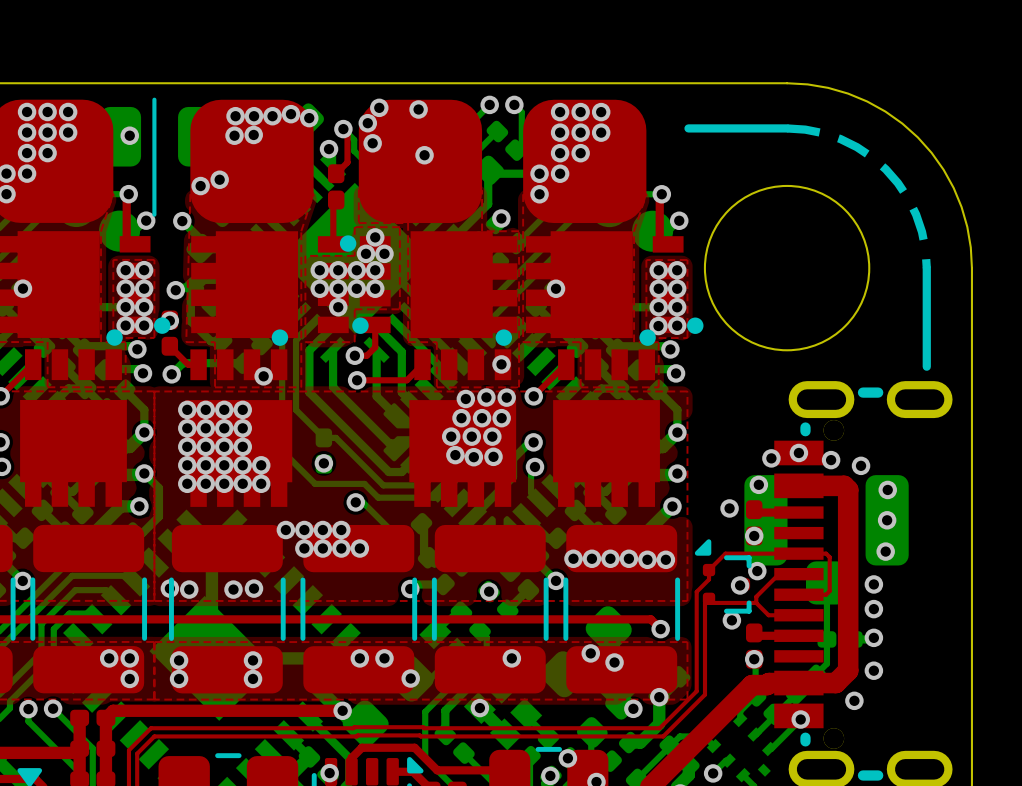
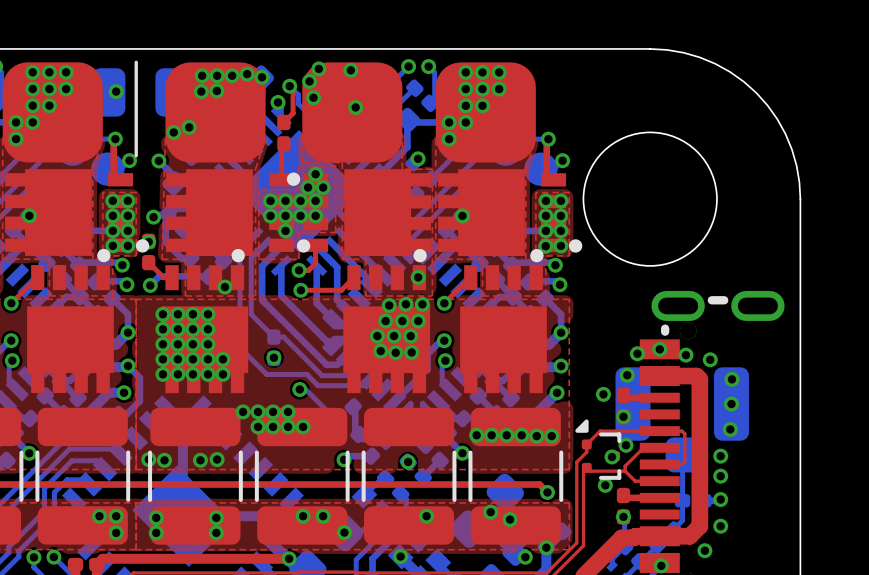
line: (688, 128) (787, 128) (823, 133) (856, 147) (885, 169) (908, 198) (922, 231) (926, 268) (926, 366) -> none

